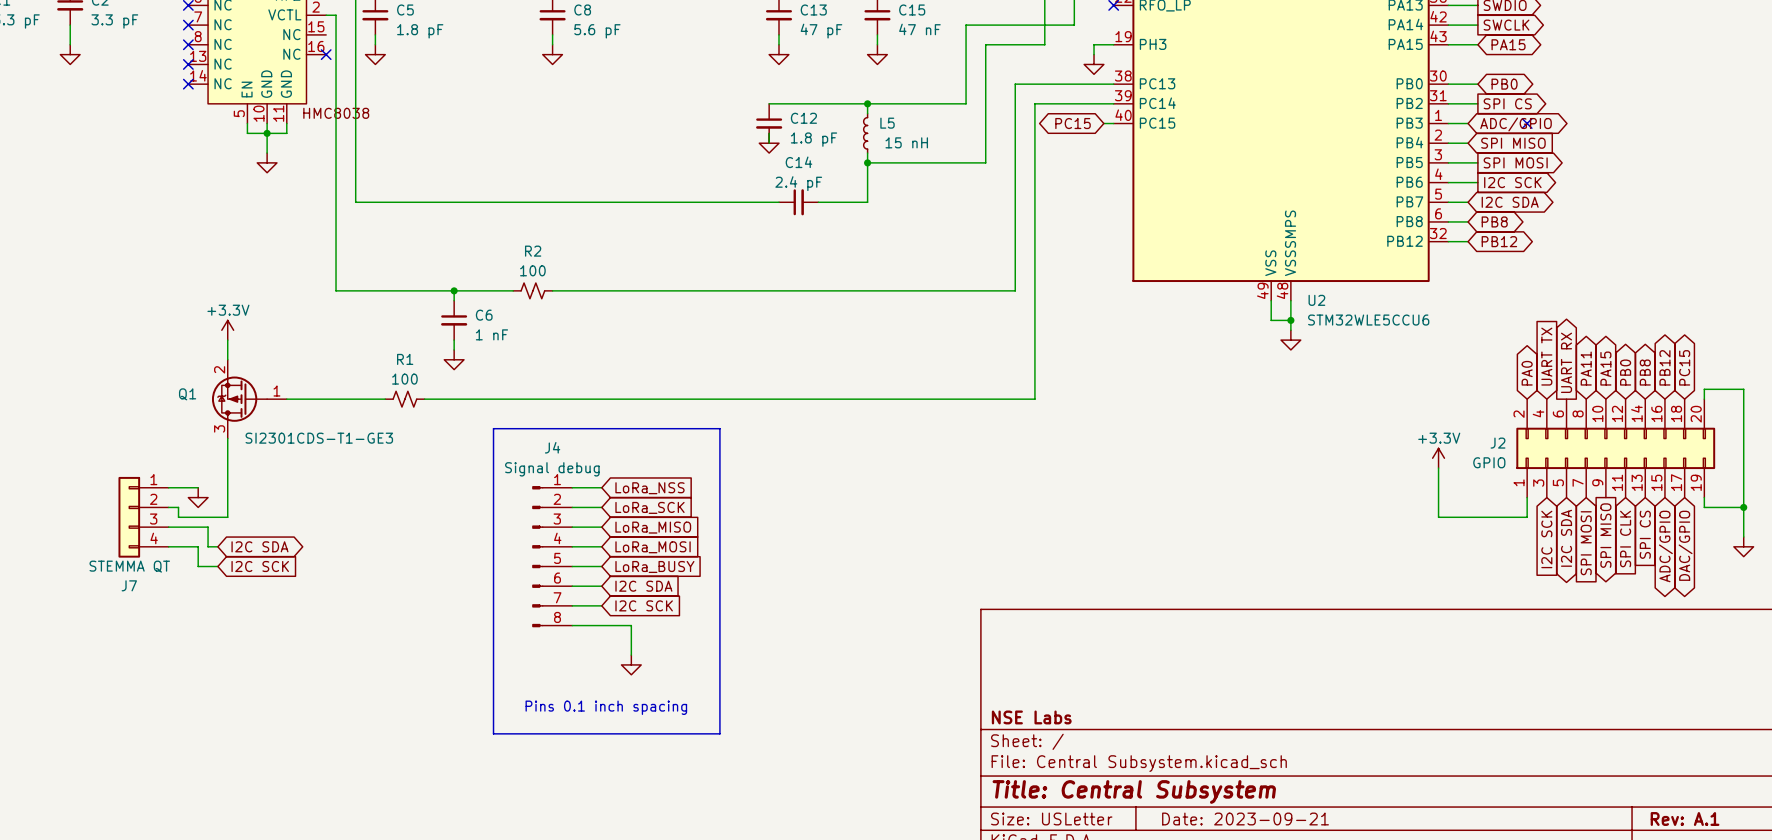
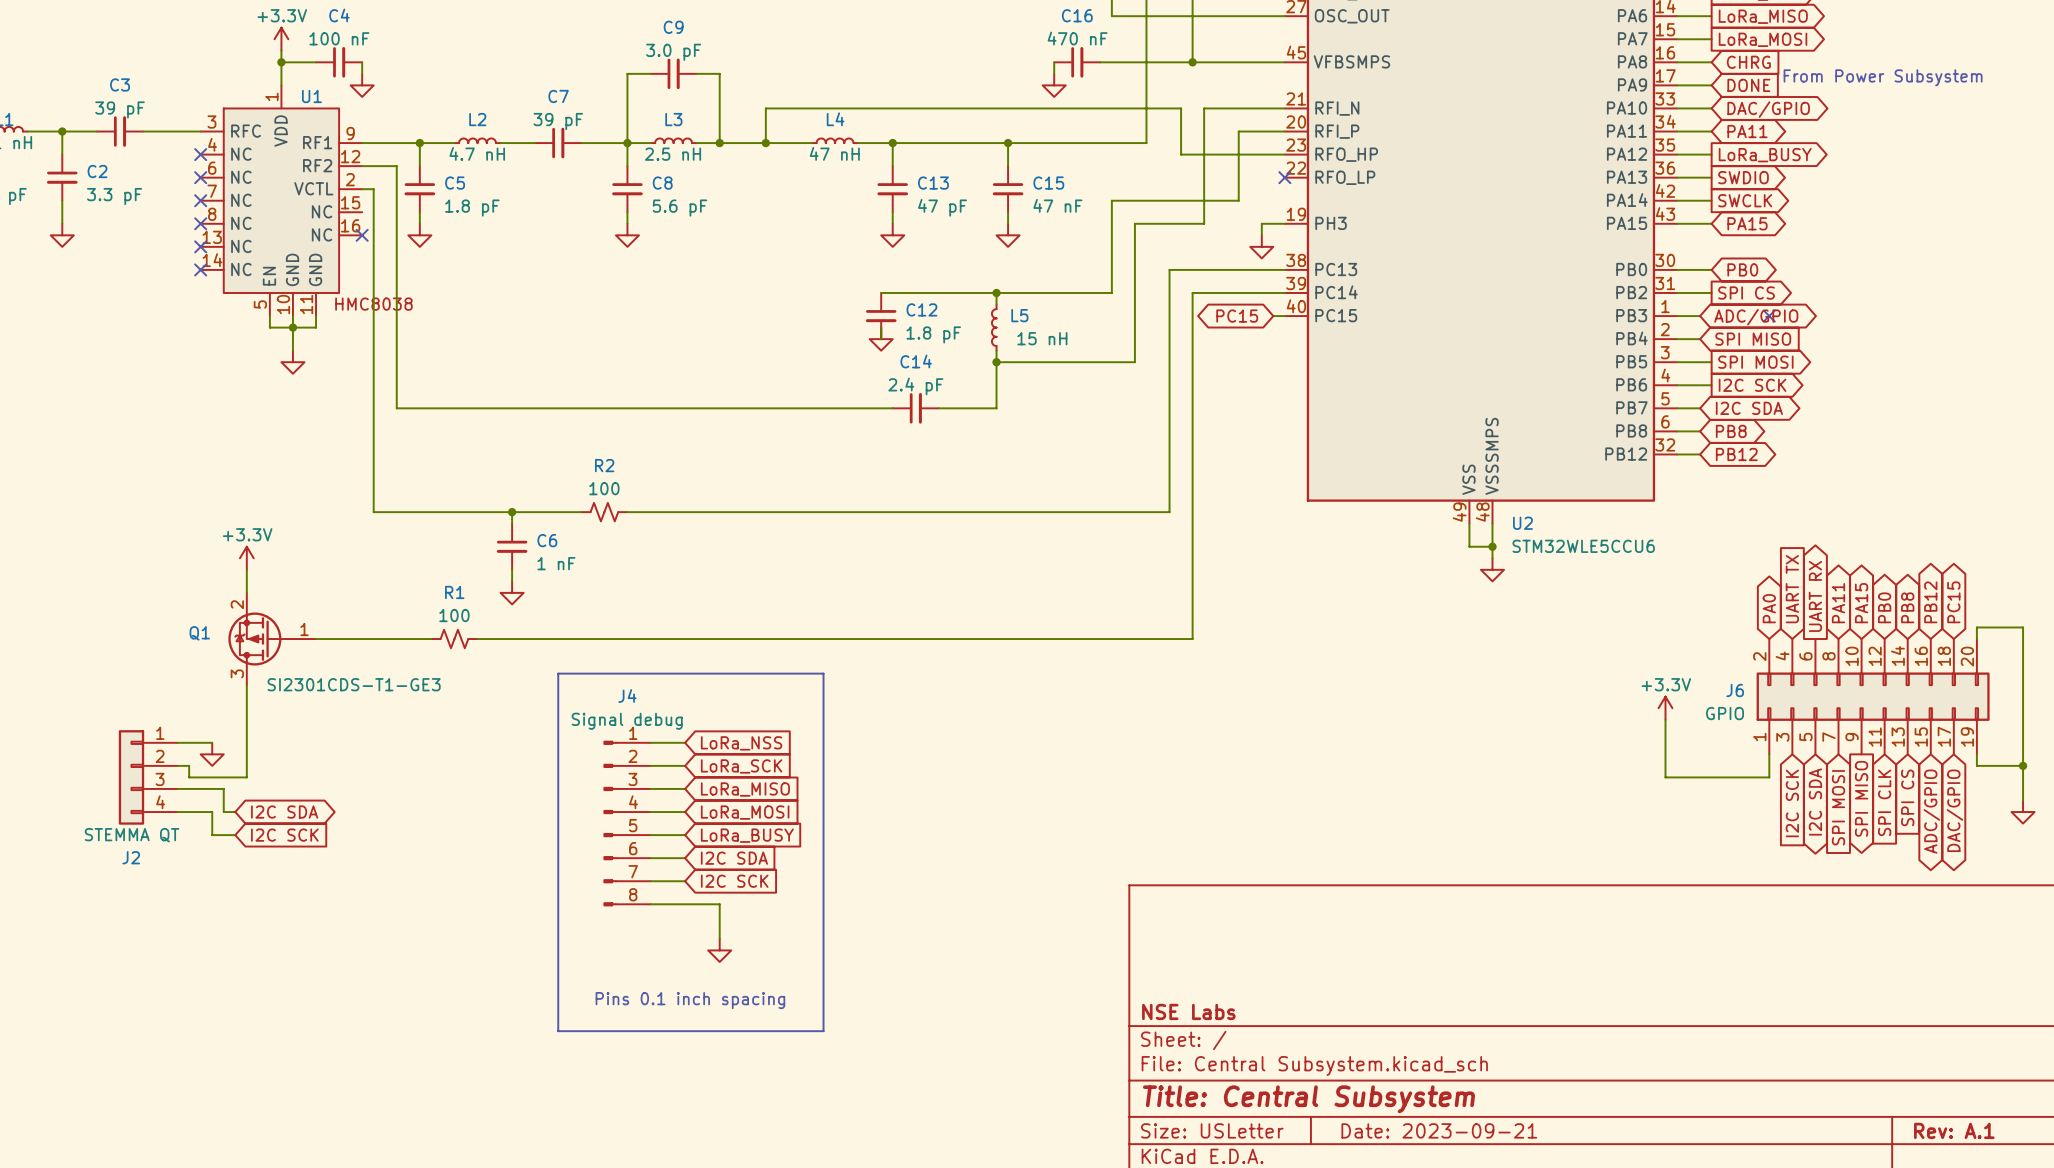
J2 name: J2 (1498, 443) -> J6 (1735, 690)
J7 name: J7 (129, 585) -> J2 (131, 857)

